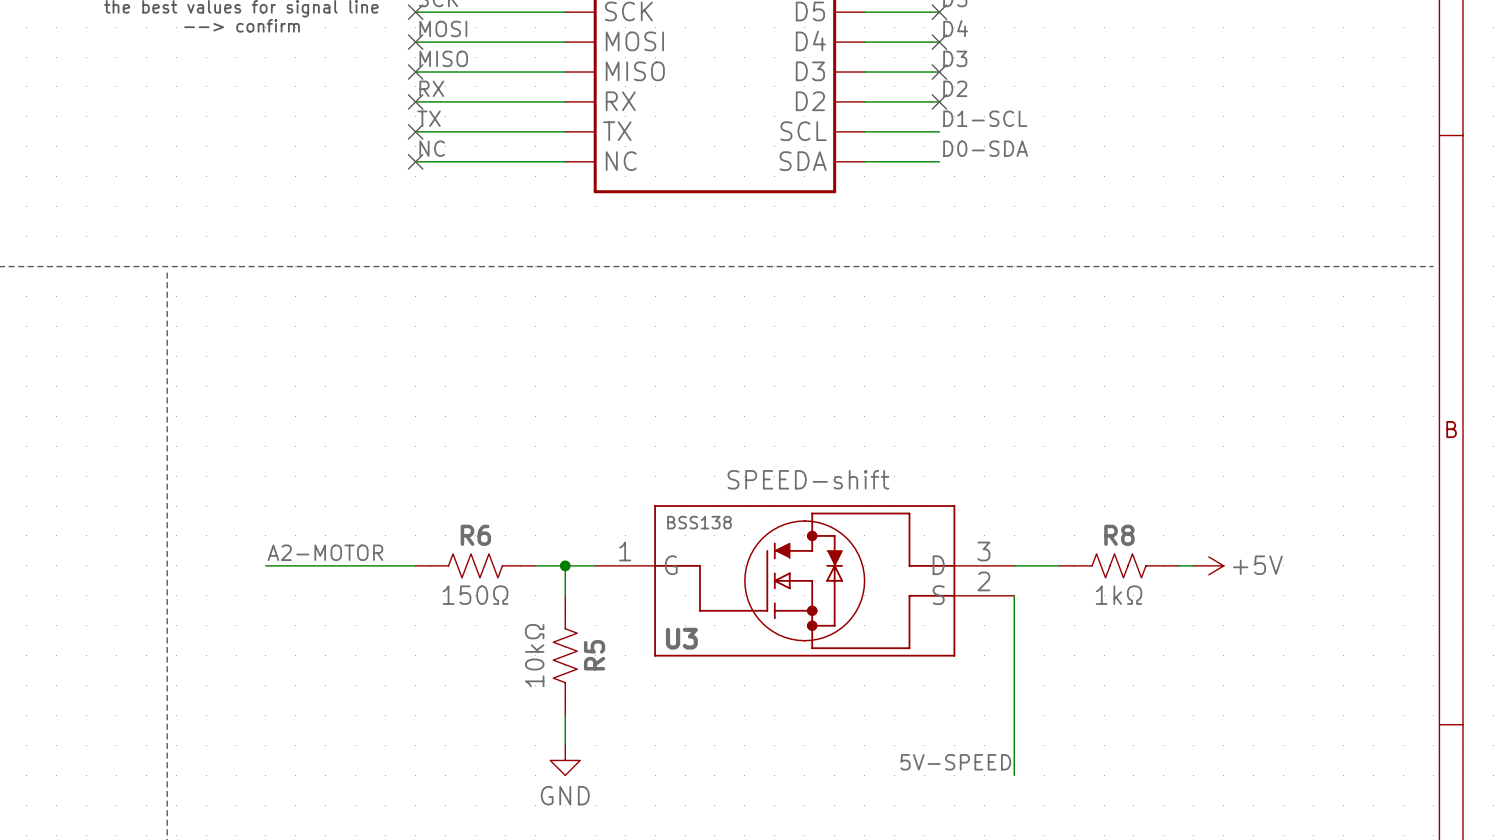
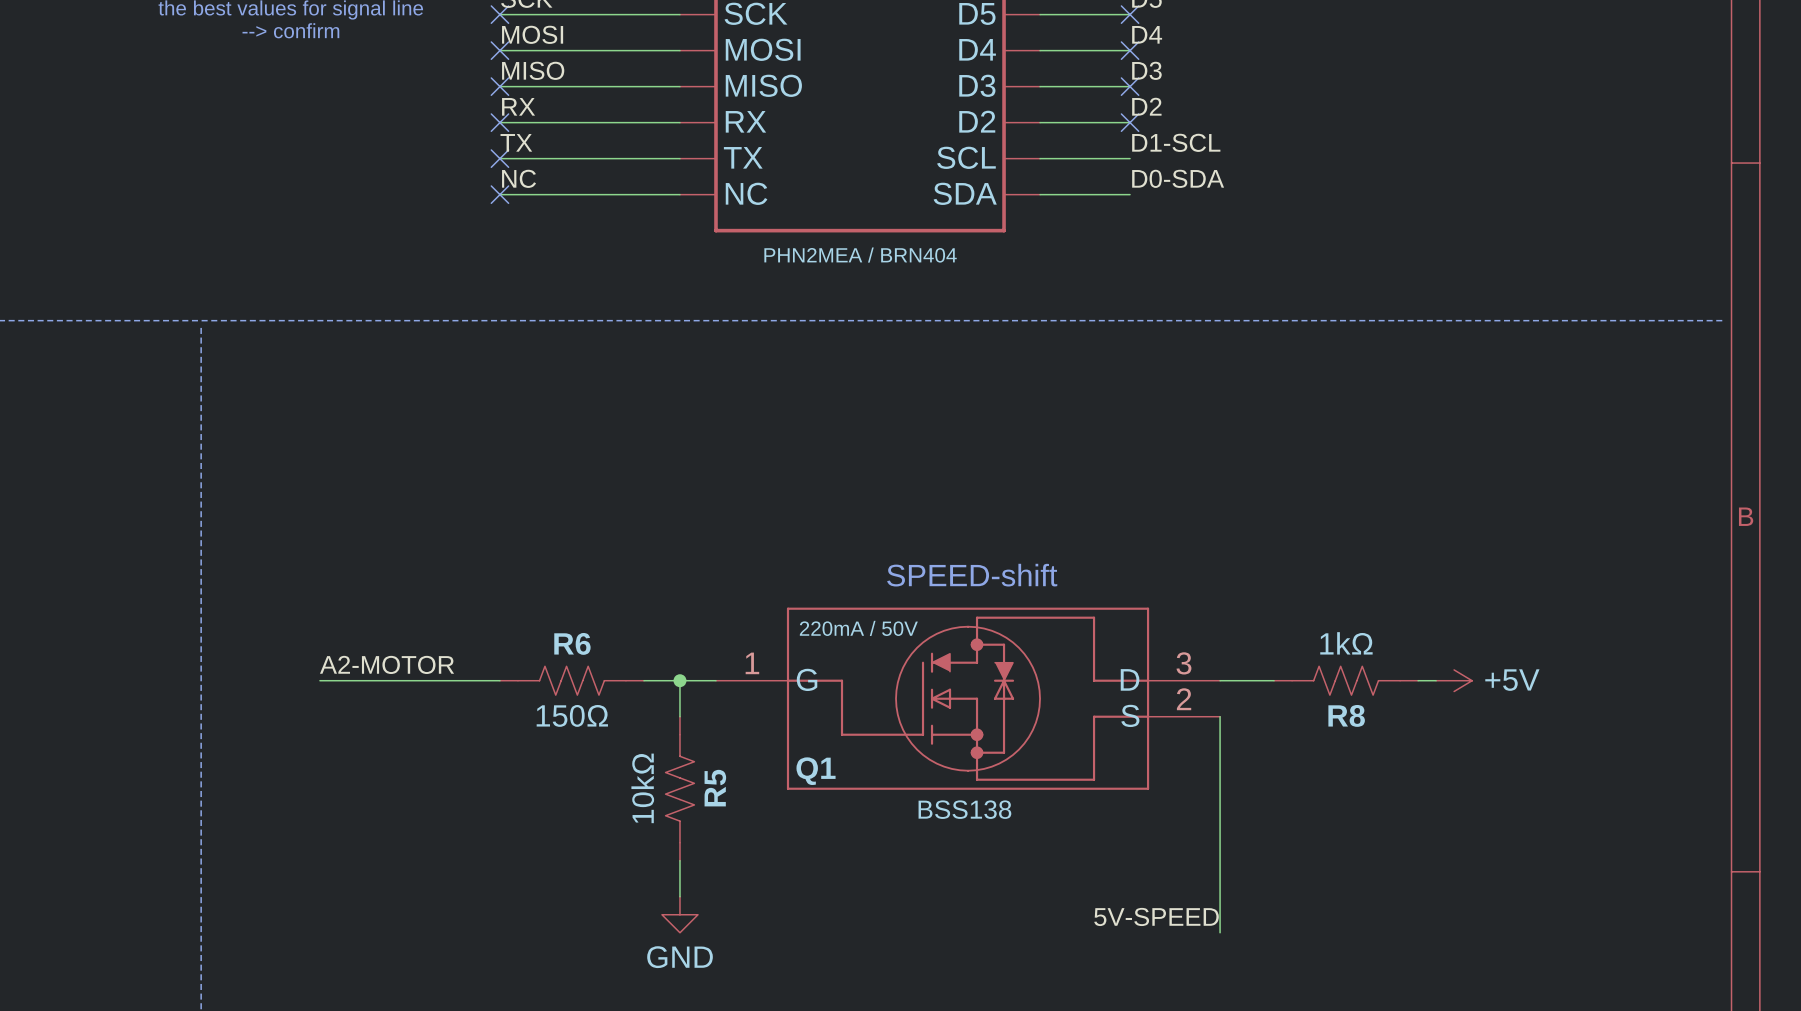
part text: none -> PHN2MEA / BRN404 (860, 255)
text: none -> SPEED-shift (972, 575)
U3 text: SPEED-shift (808, 479) -> none
U3 value: BSS138 (699, 522) -> 220mA / 50V (858, 628)
R8 name position: R8 (1119, 535) -> R8 (1346, 715)
R8 value position: 1kΩ (1119, 595) -> 1kΩ (1346, 643)
U3 name: U3 (681, 638) -> Q1 (816, 771)
U3 text: none -> BSS138 (964, 809)

